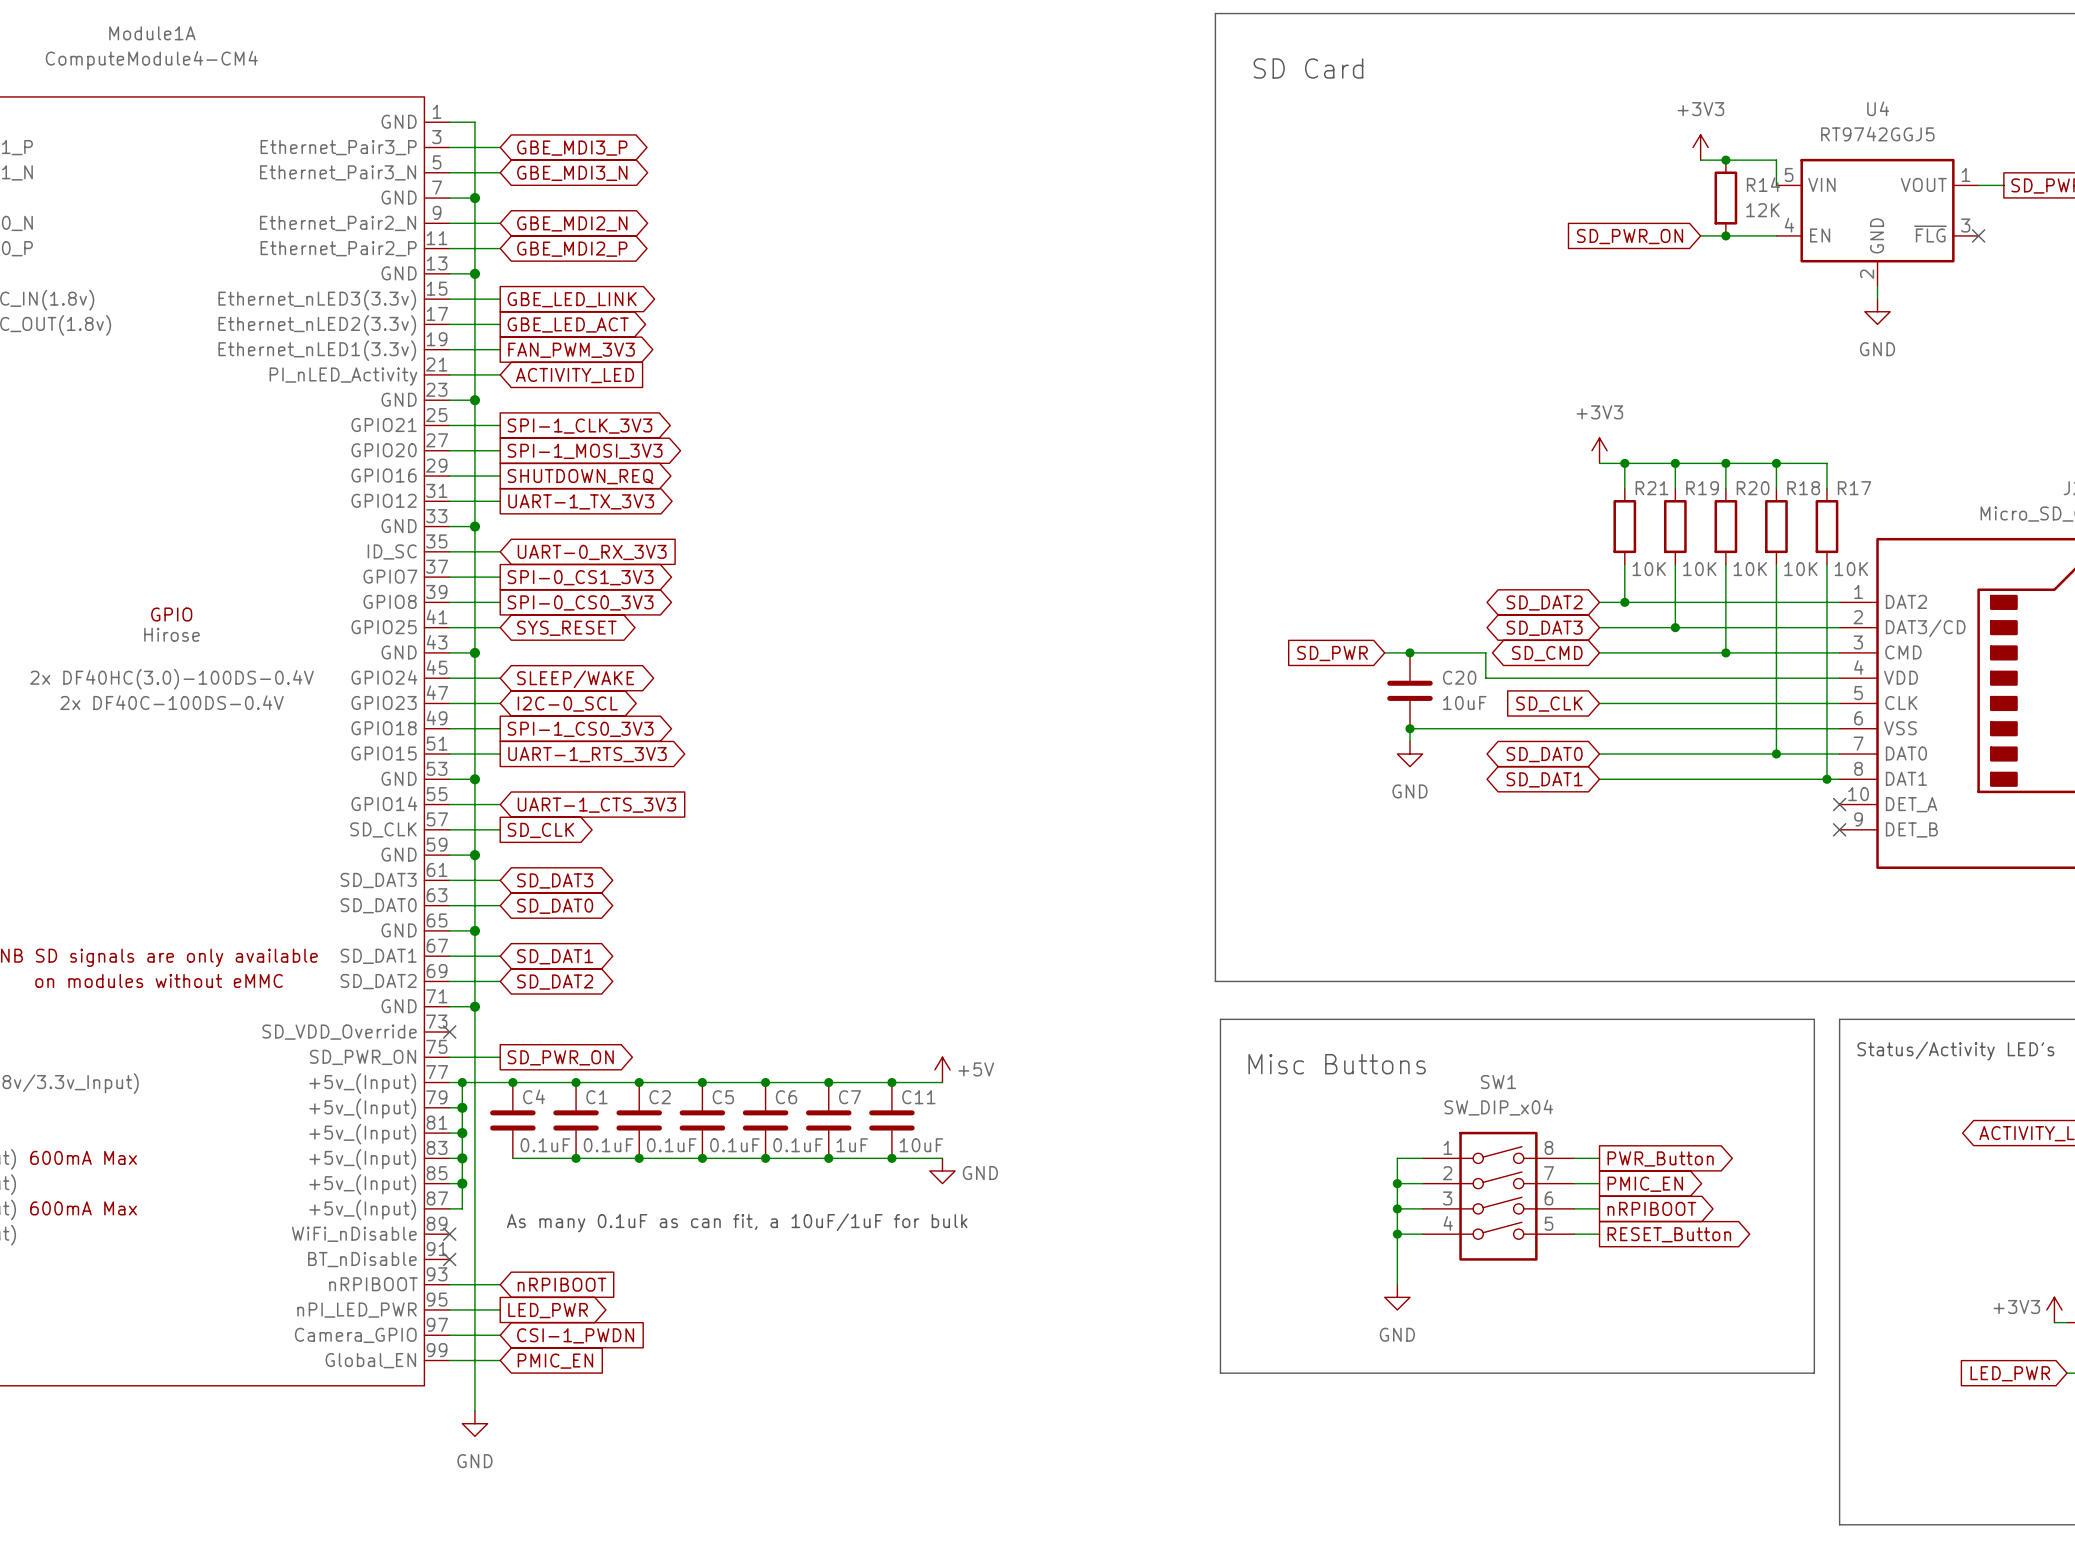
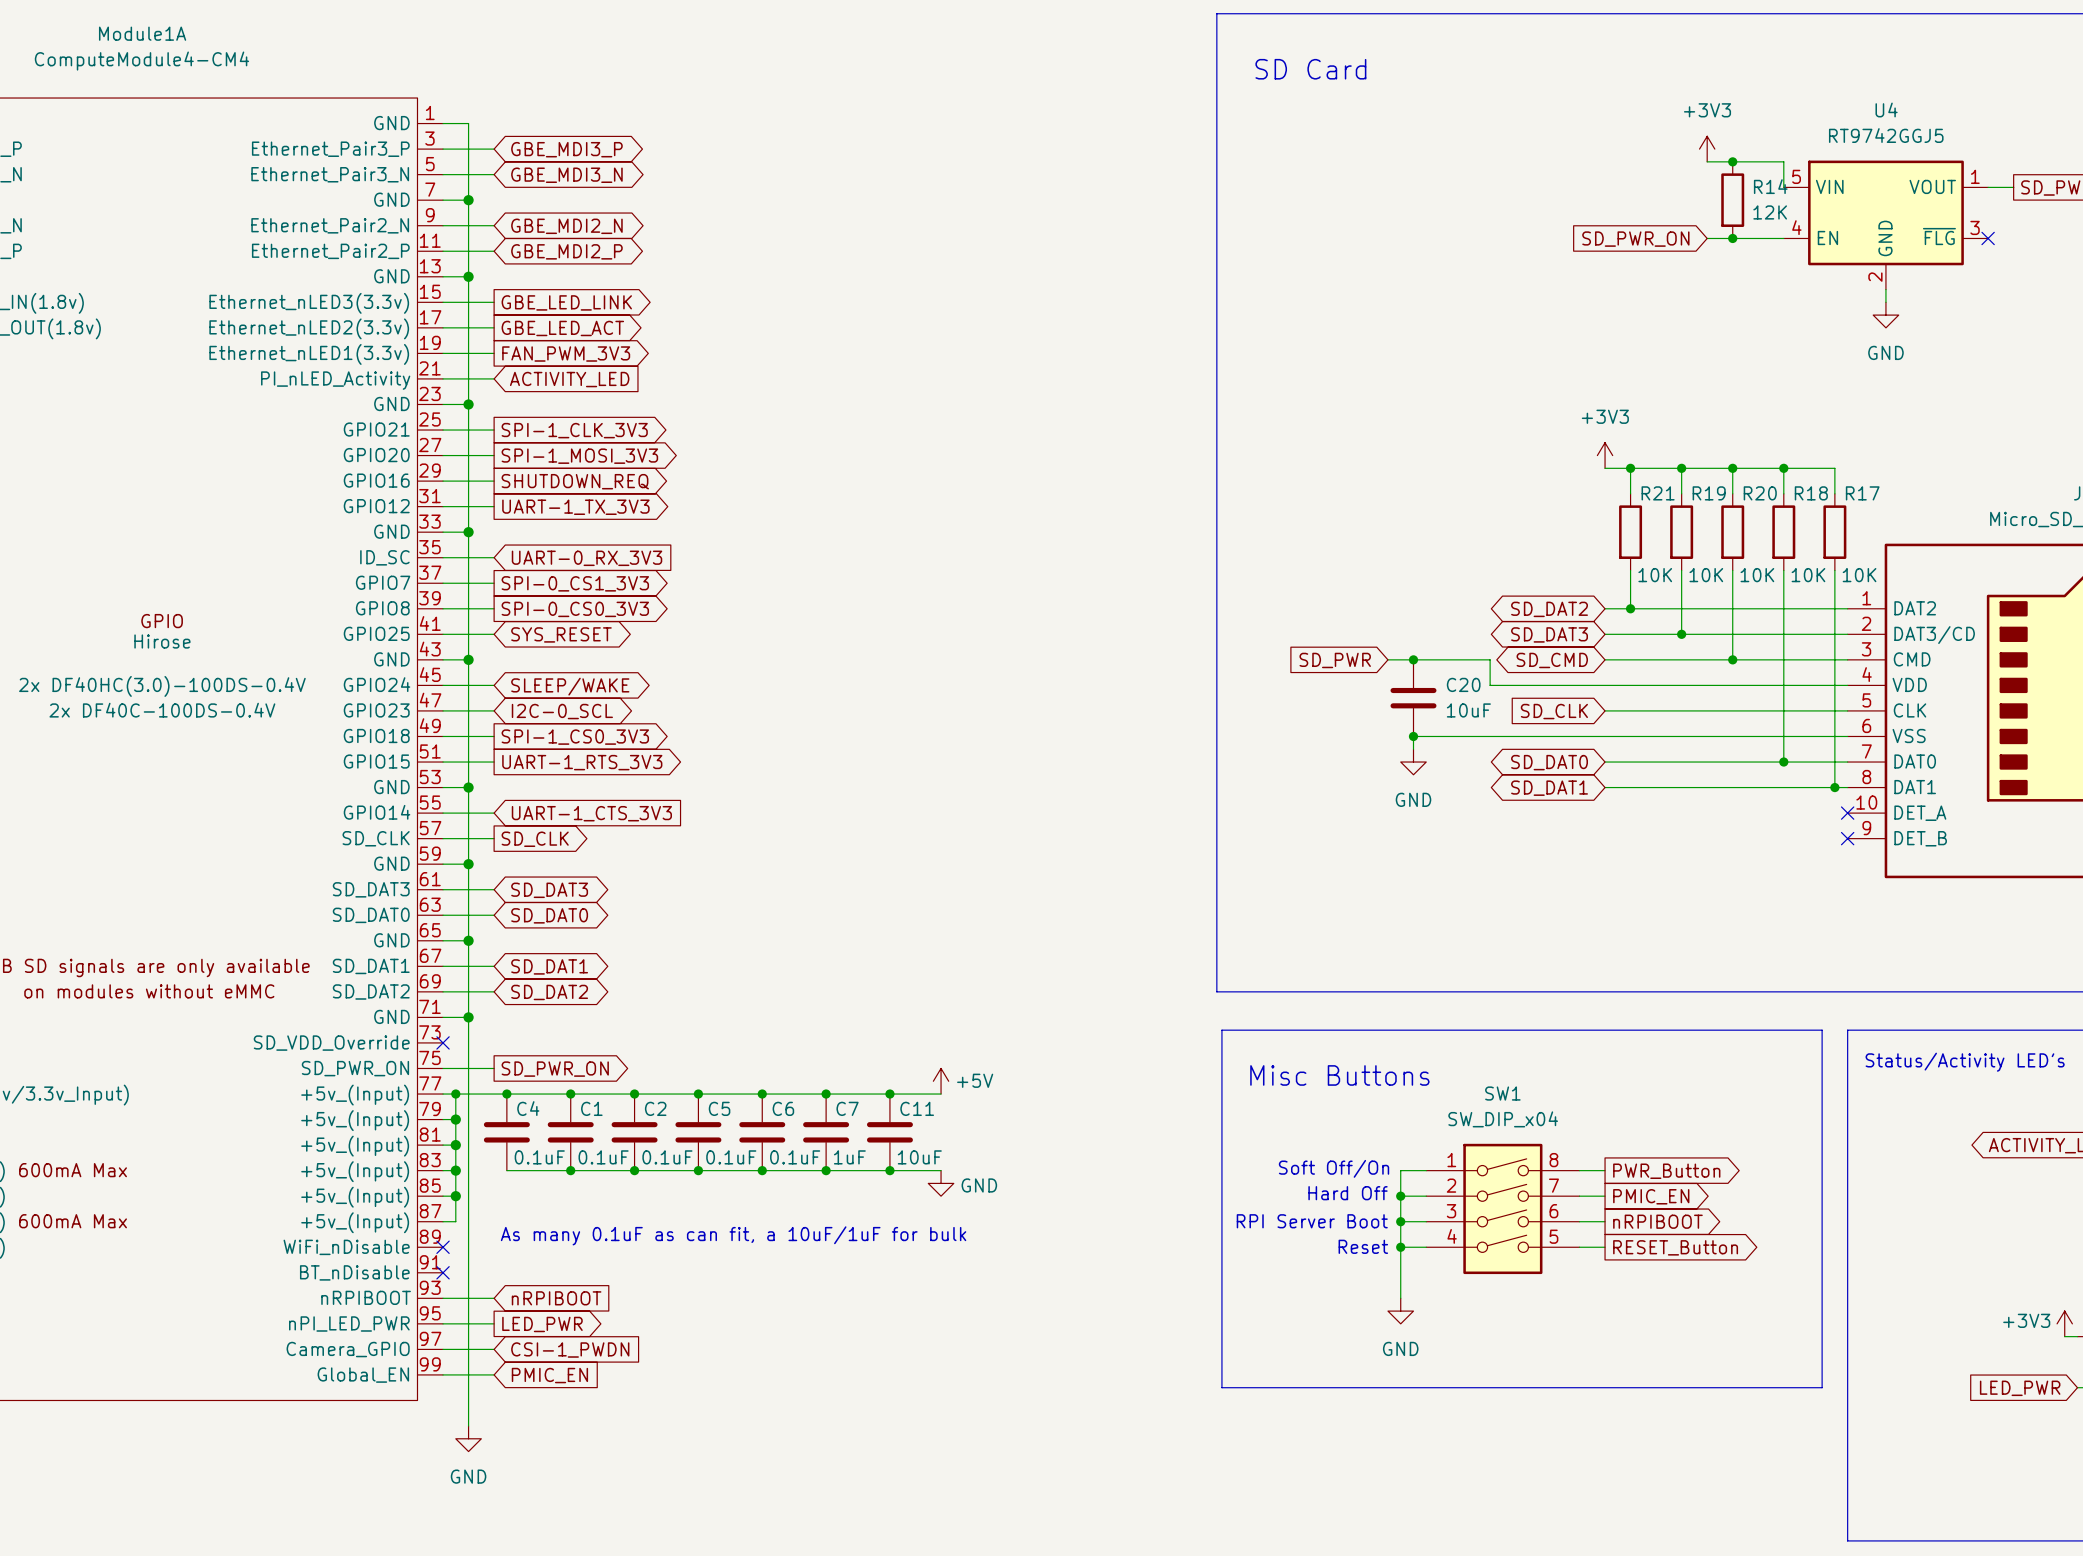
text: none -> Soft Off/On (1334, 1168)
text: none -> Hard Off (1348, 1193)
text: none -> RPI Server Boot (1312, 1221)
text: none -> Reset (1363, 1246)

